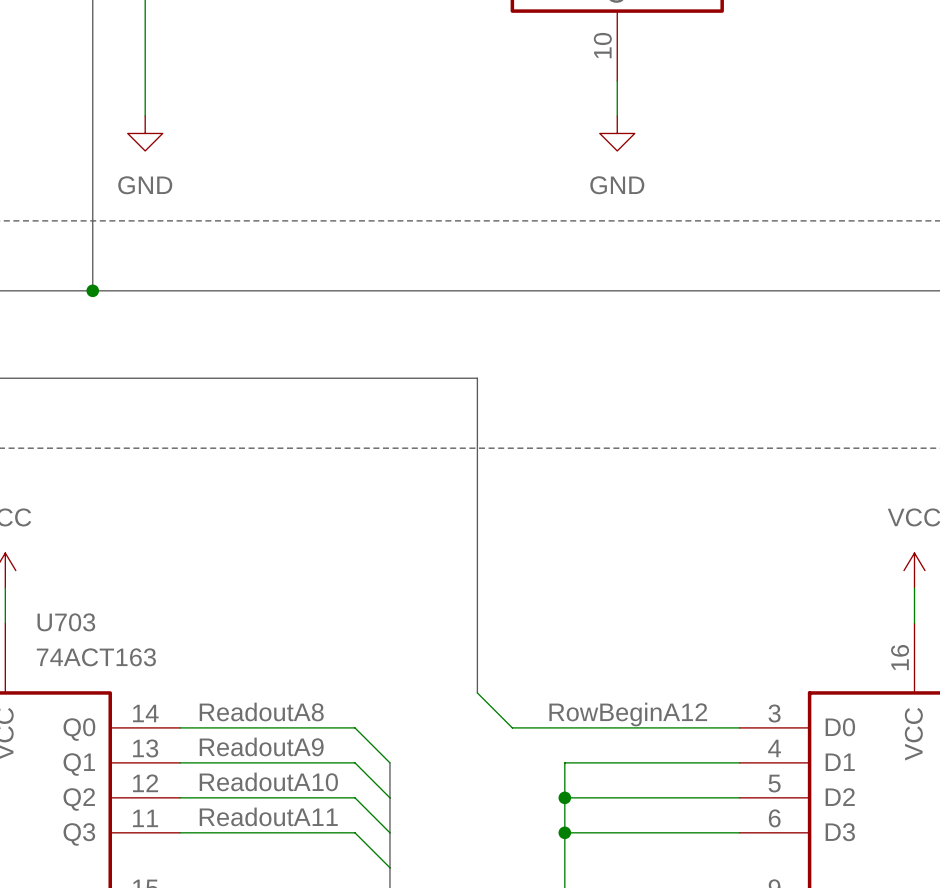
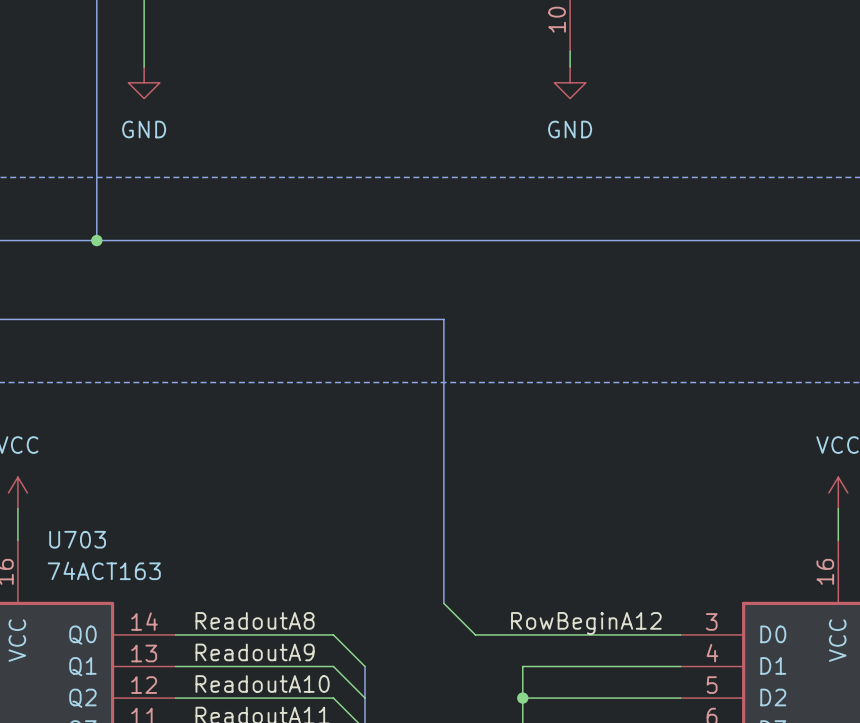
power symbol position: GND (145, 133) -> GND (144, 82)
power symbol position: GND (617, 133) -> GND (570, 82)

